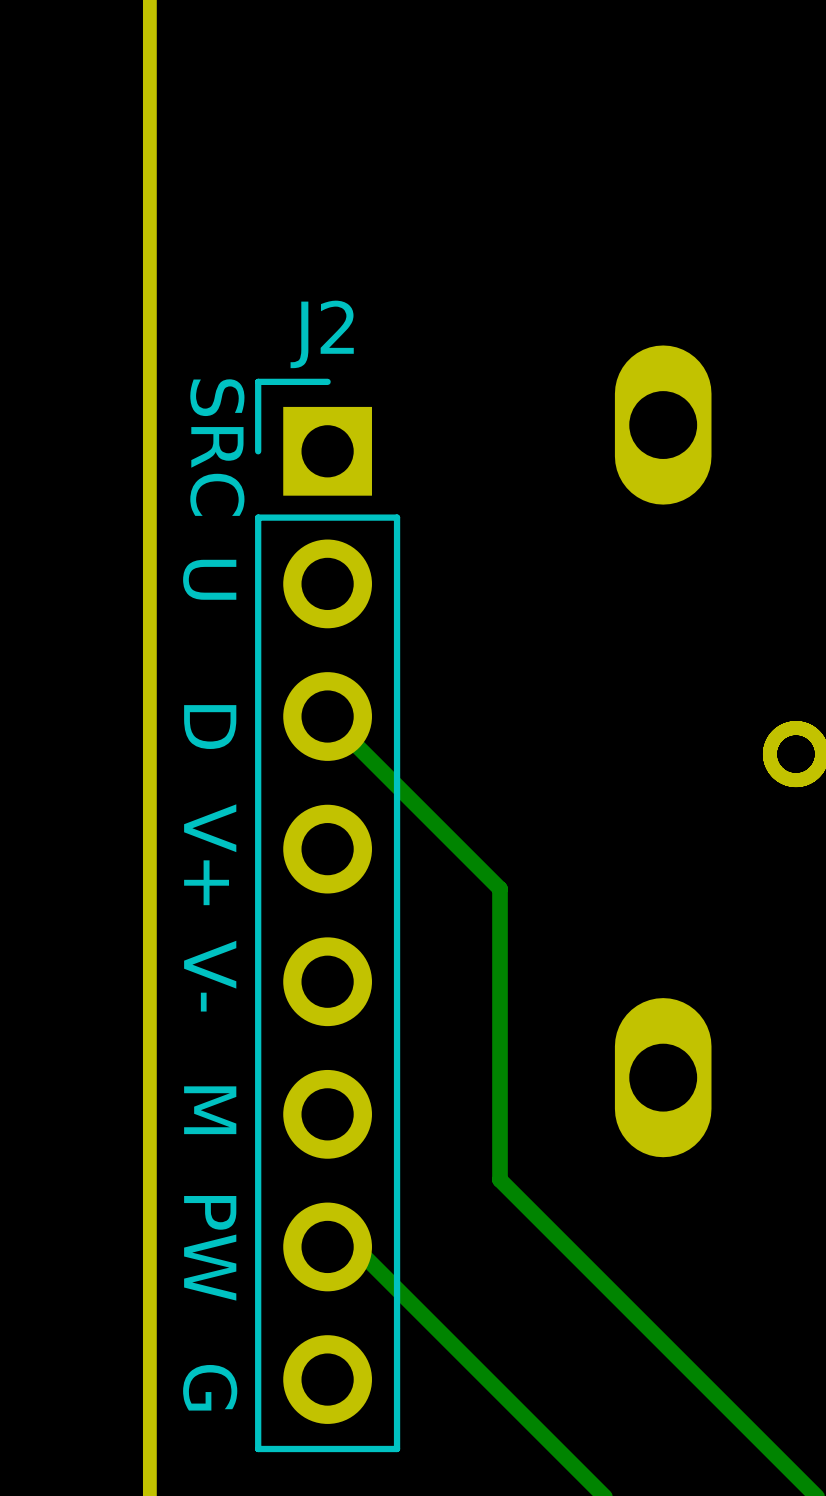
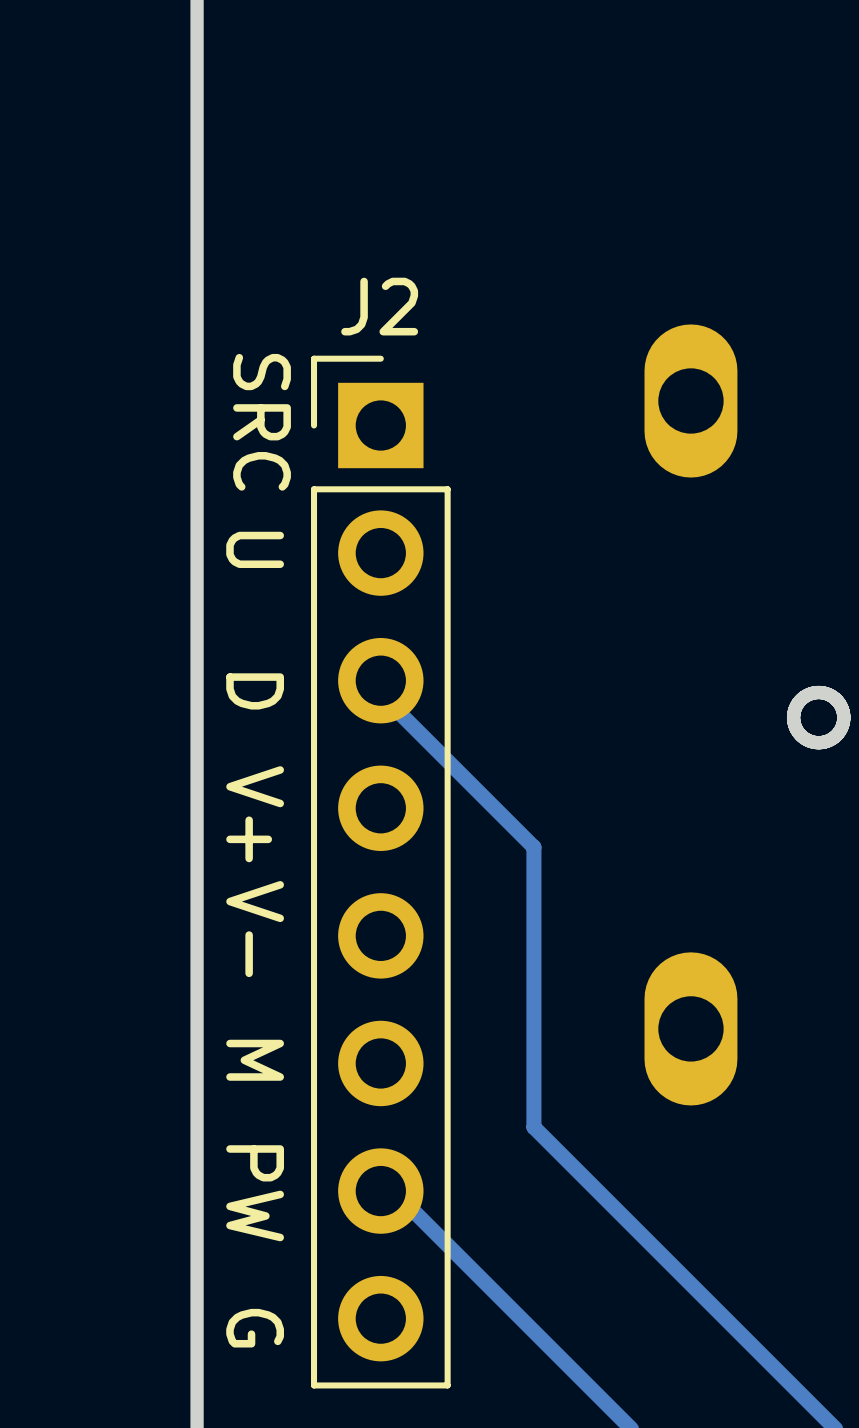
J2 position: (327, 915) -> (380, 872)

